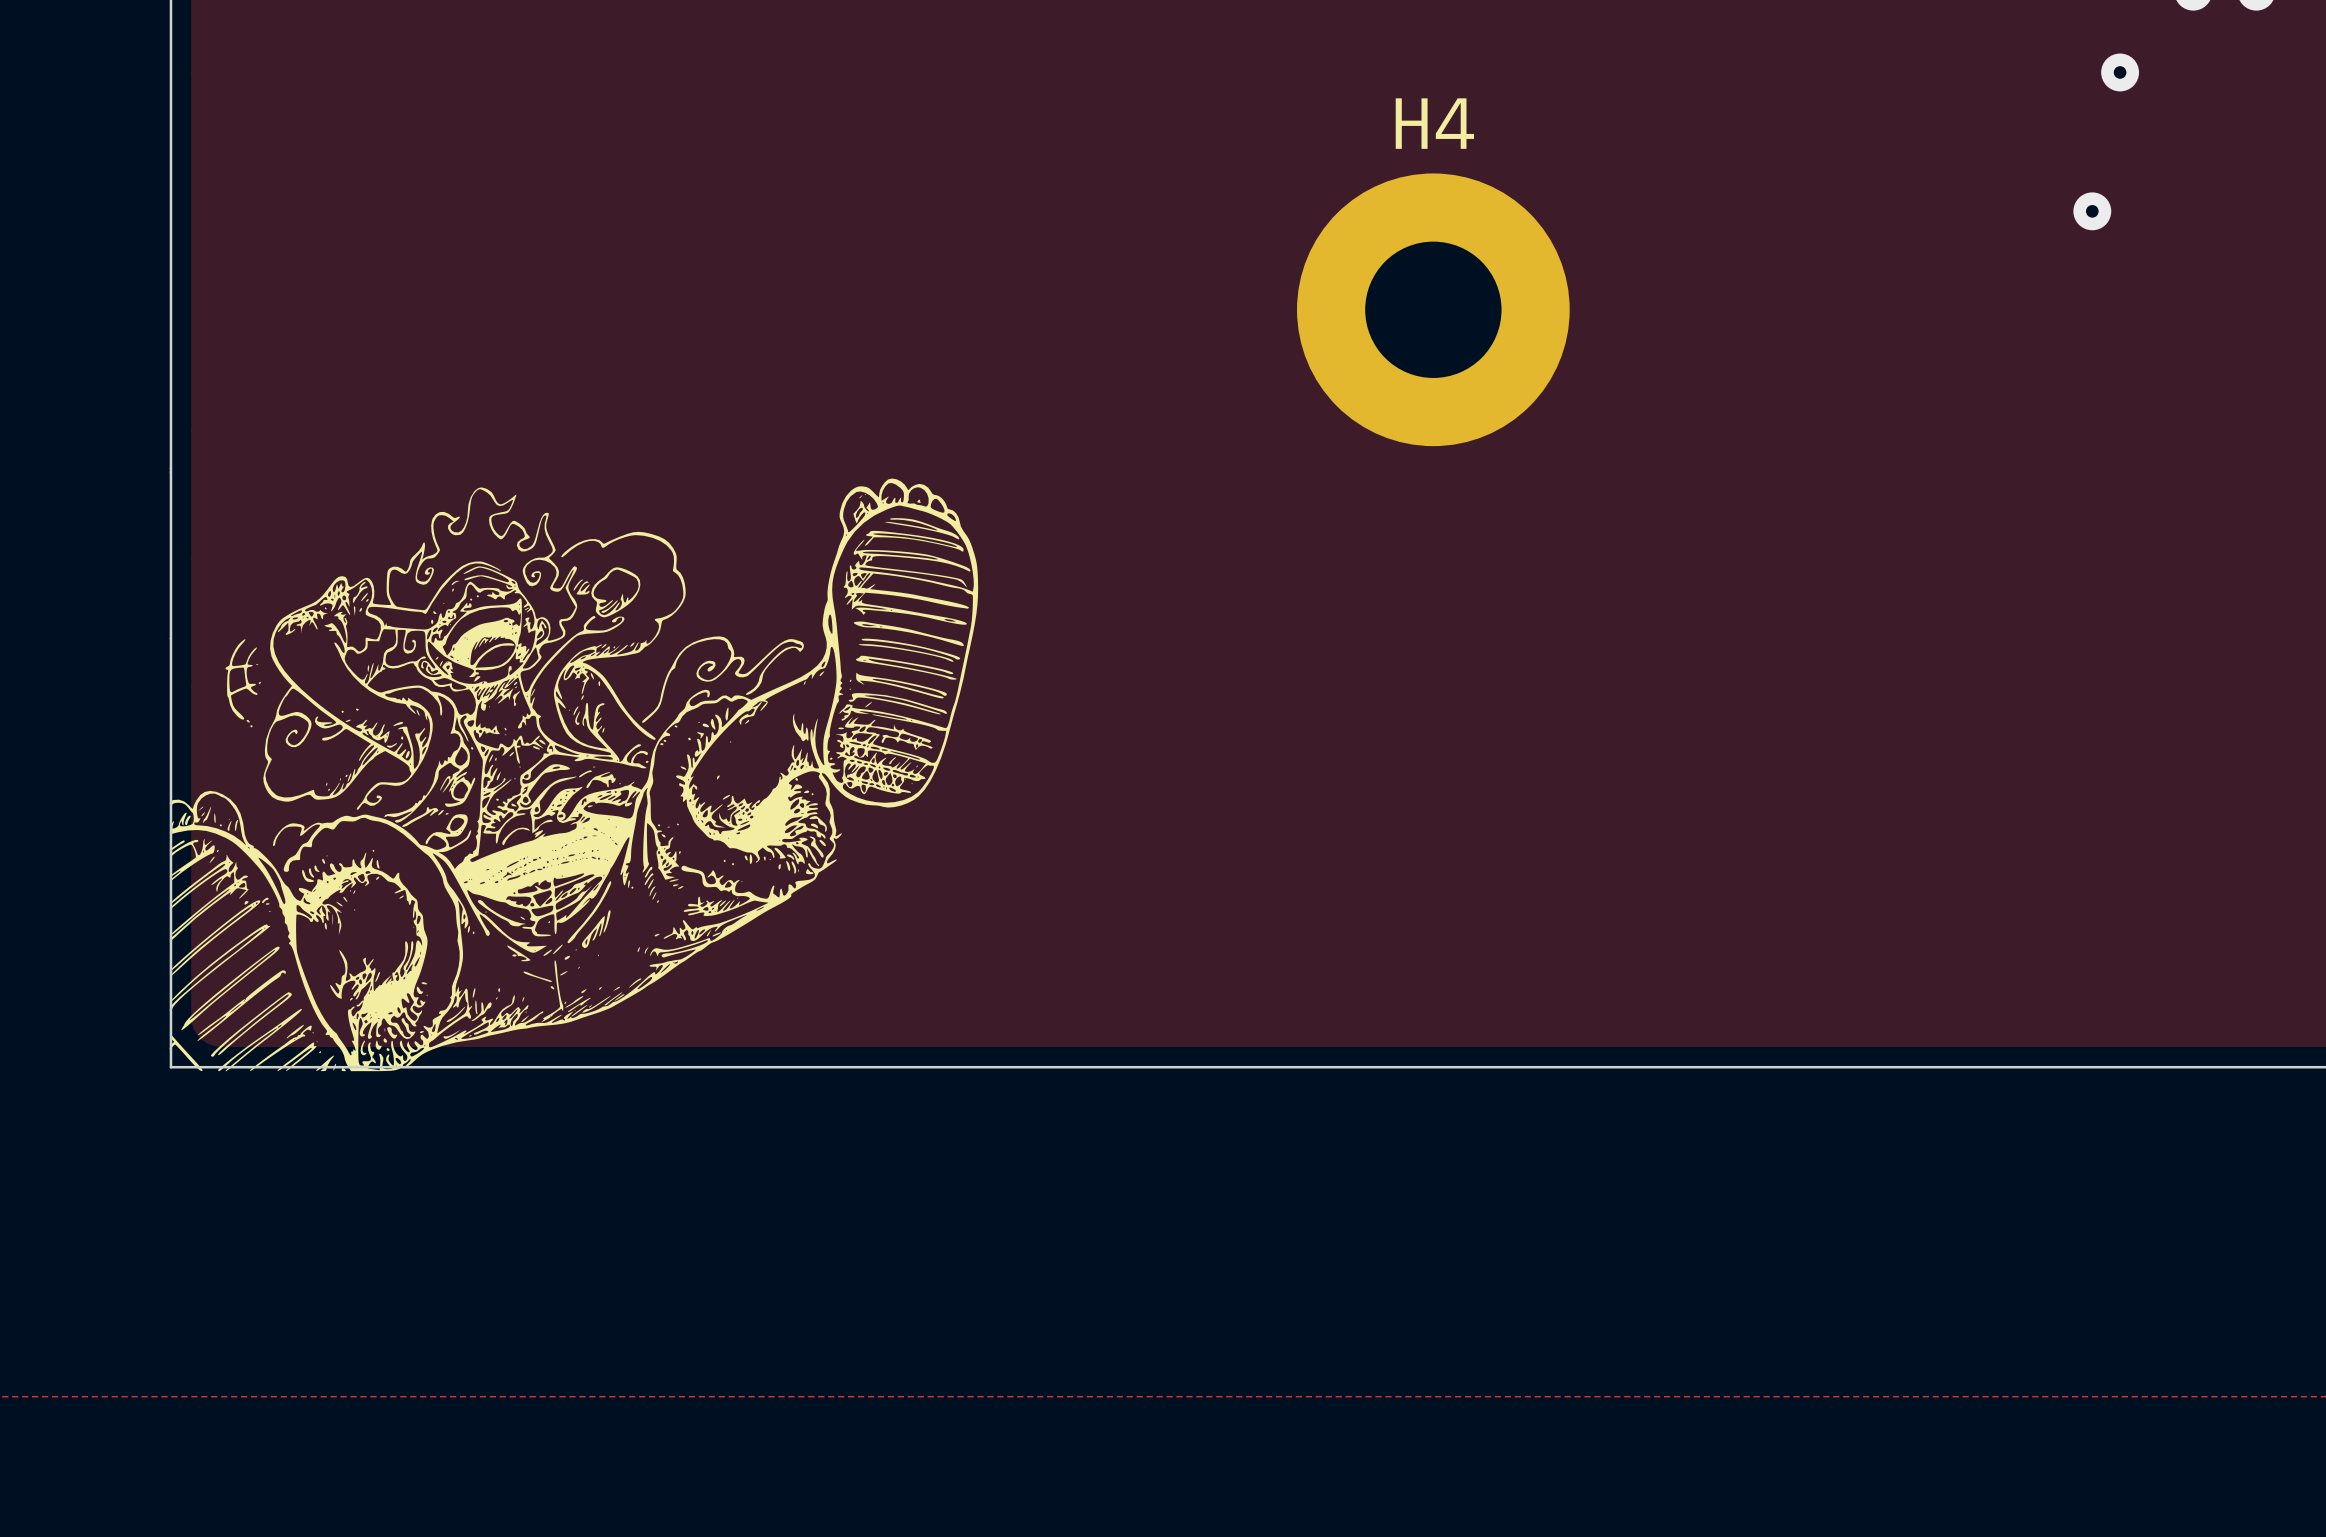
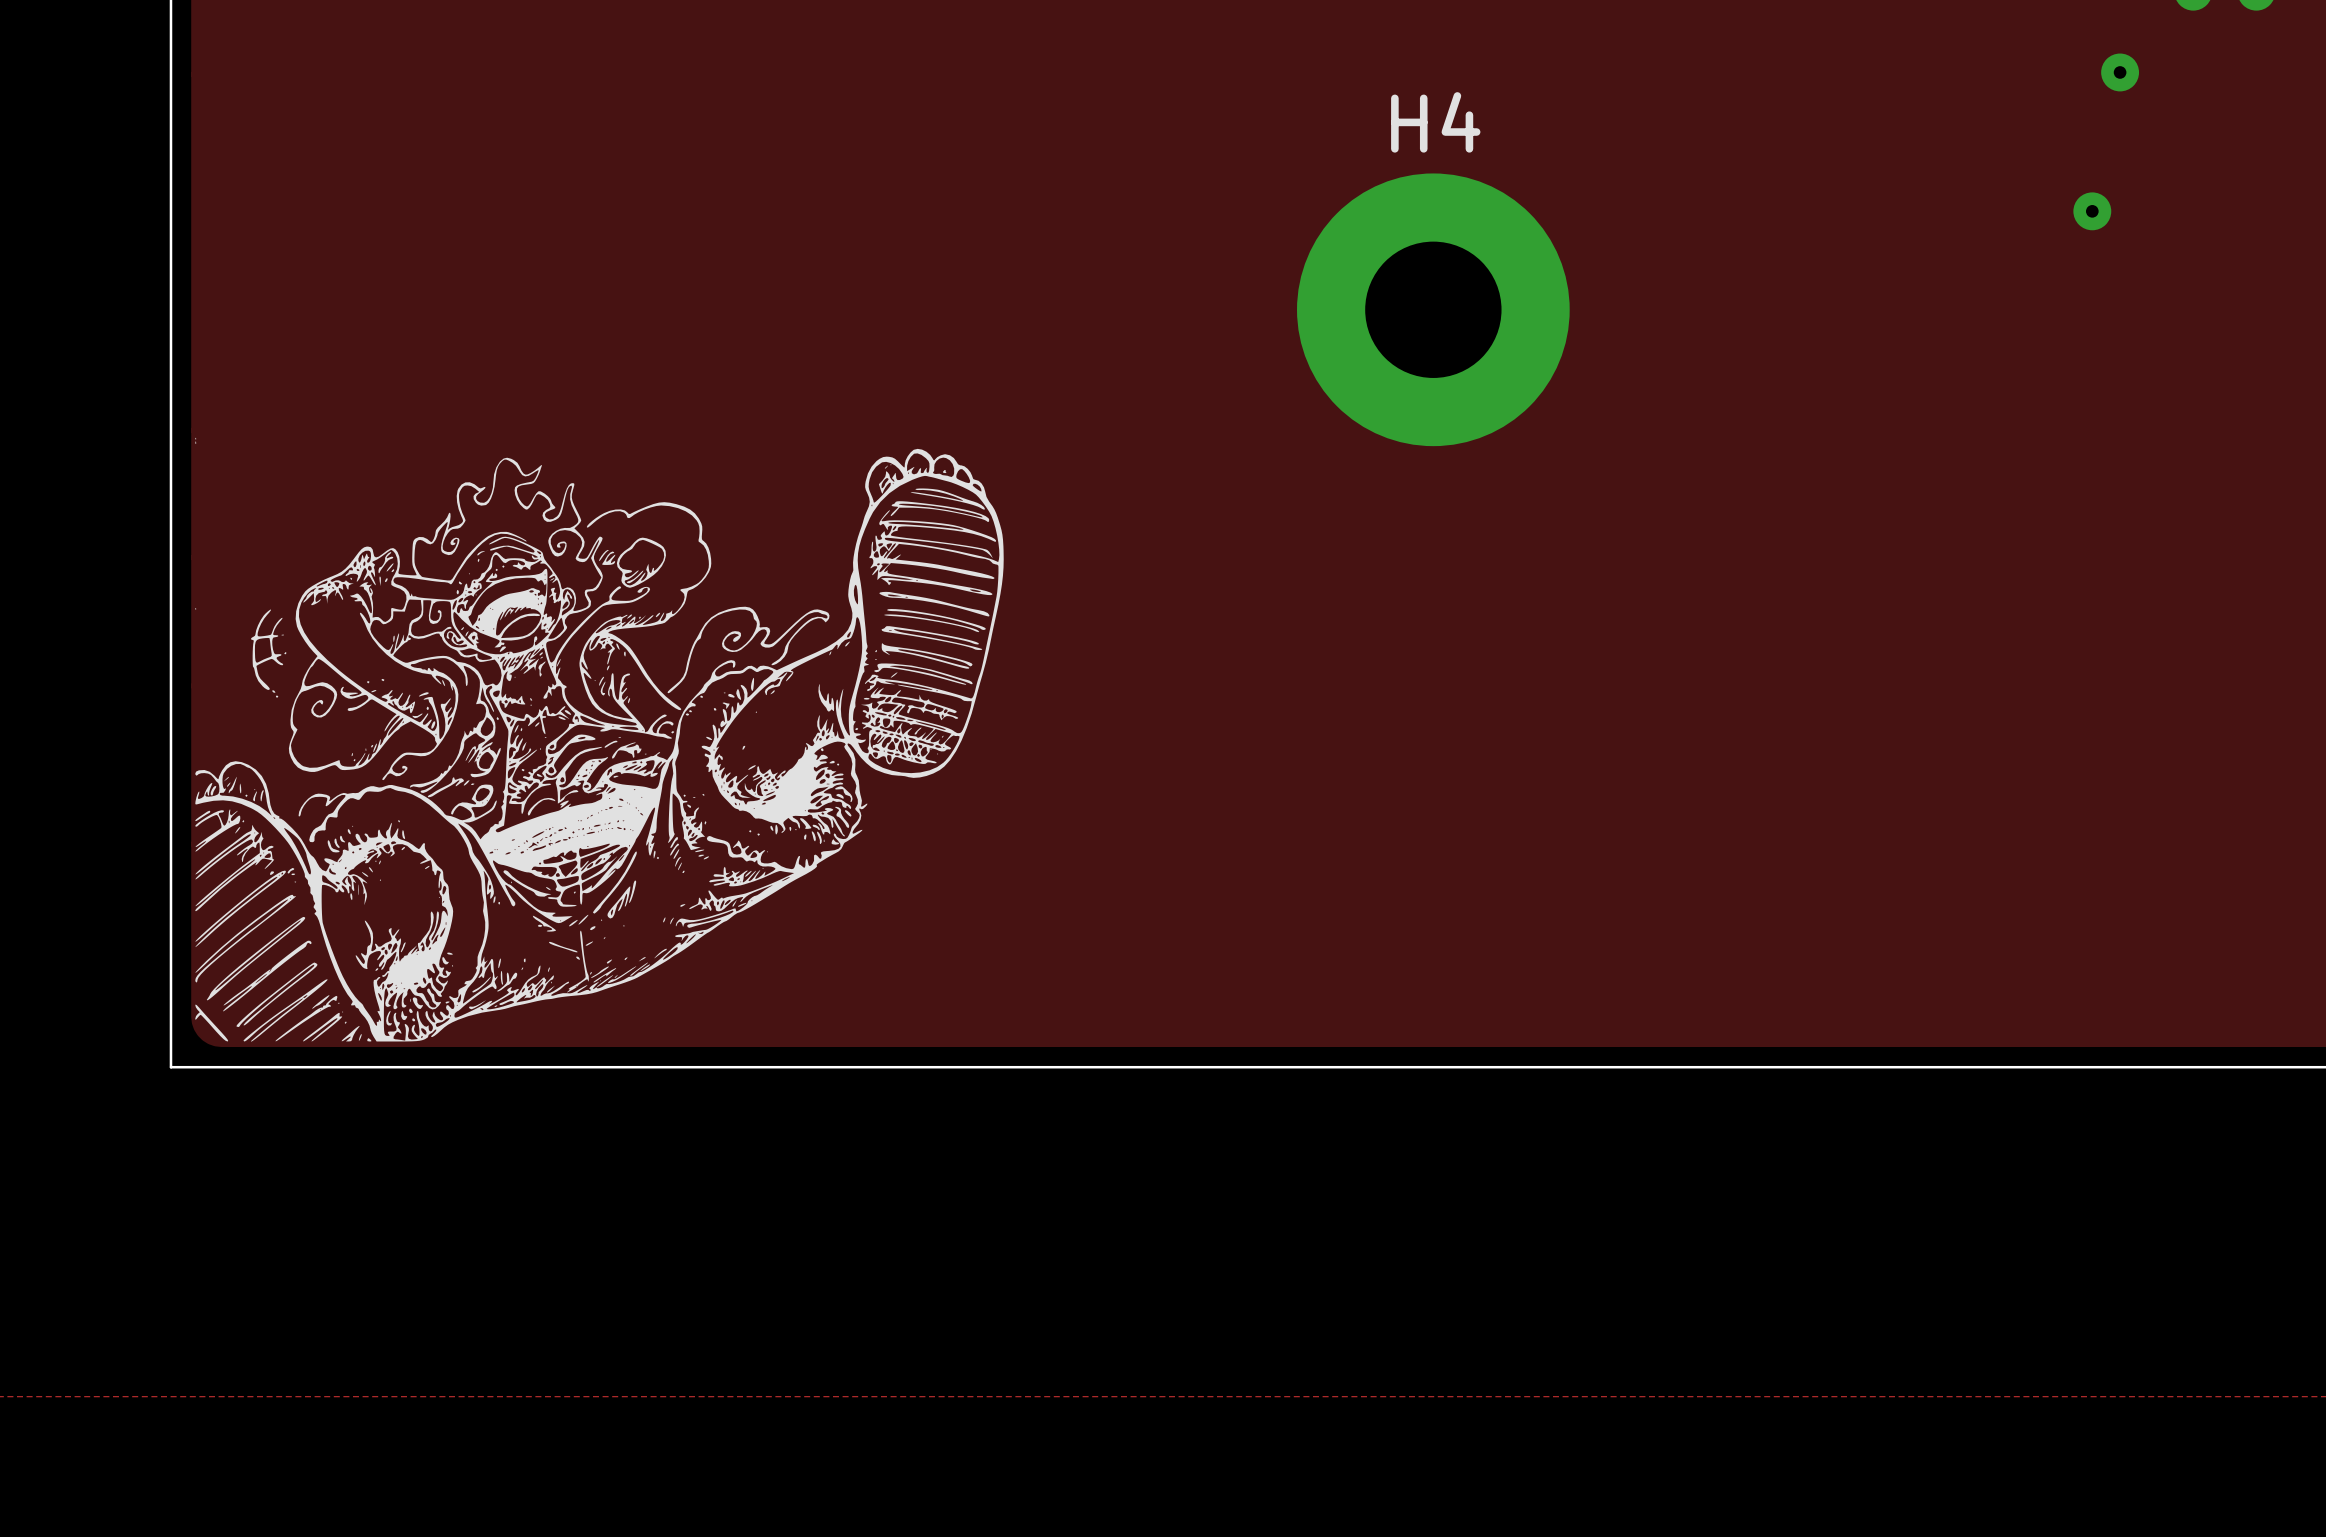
drawing position: (573, 769) -> (599, 739)

